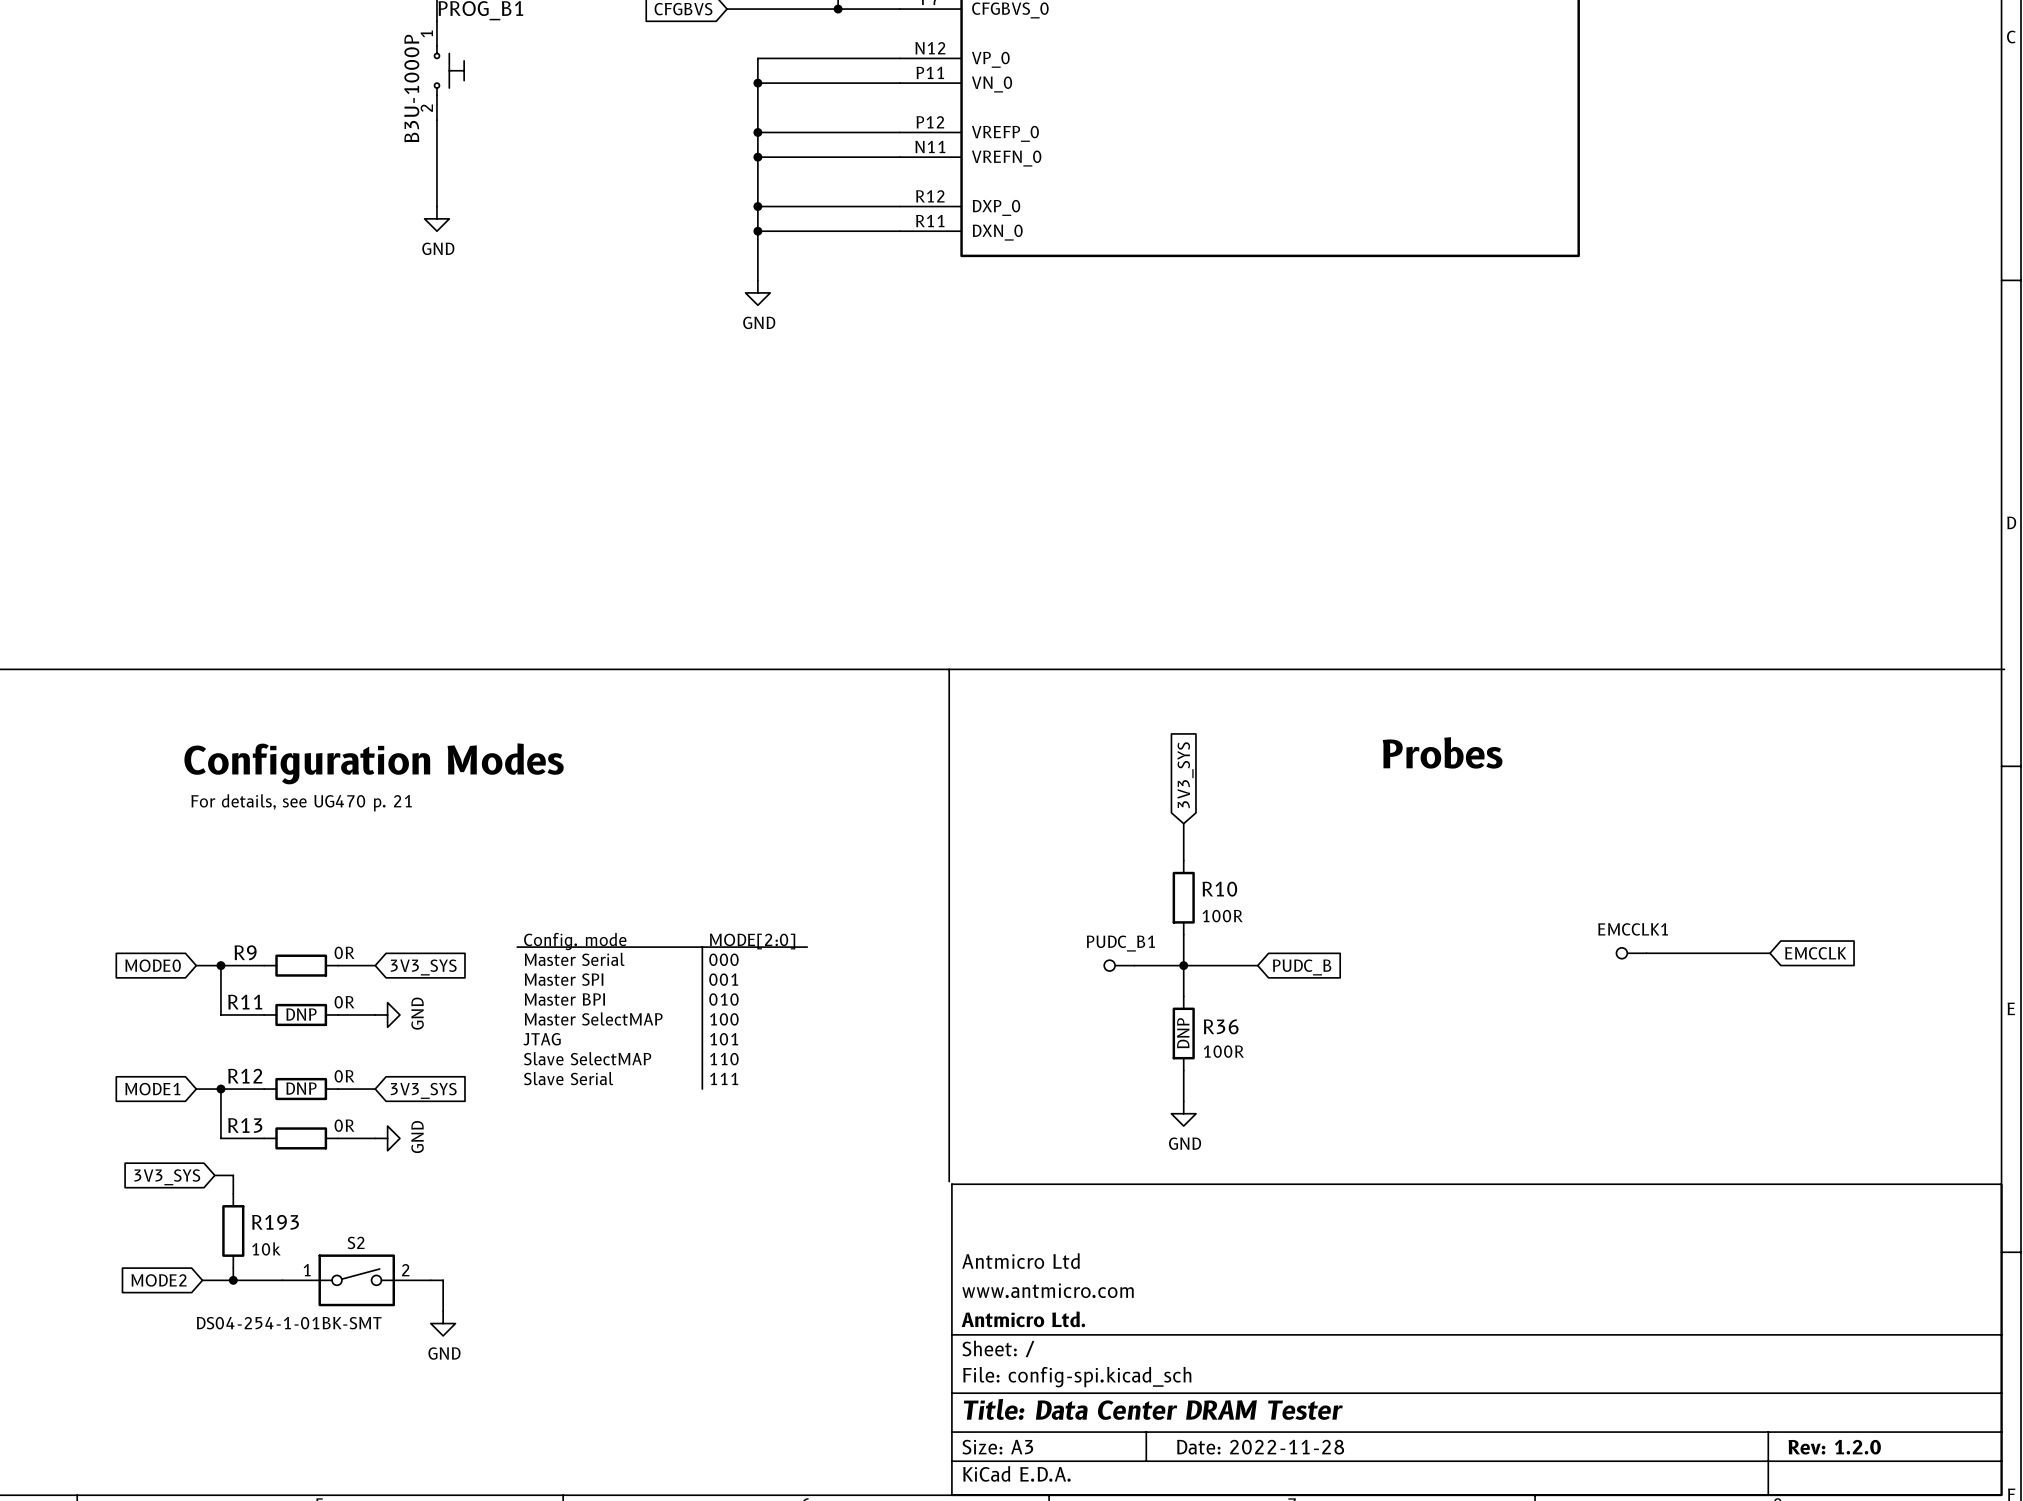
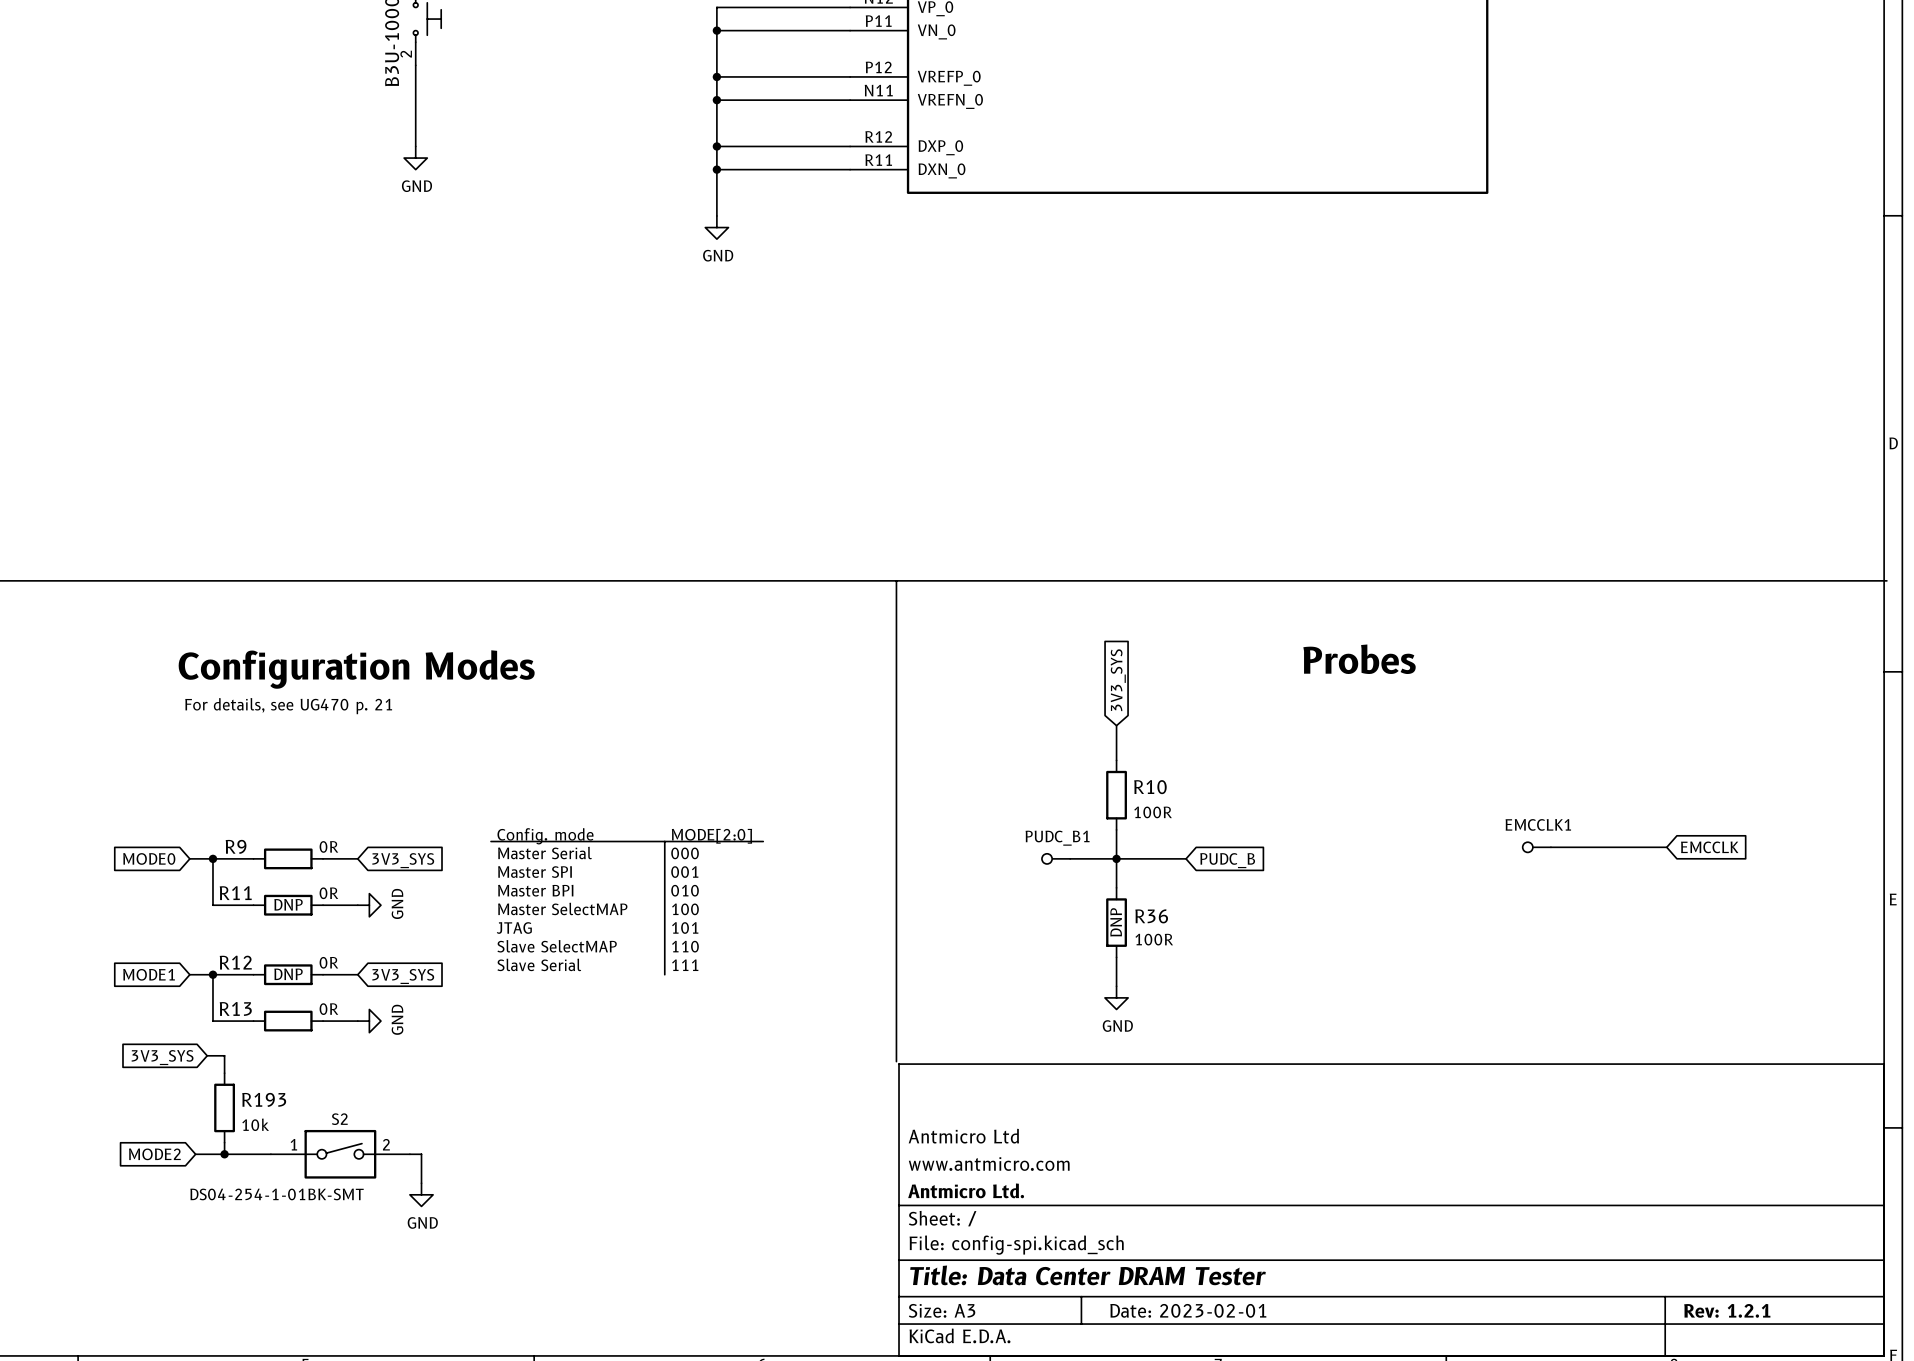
title block: Date: 2022-11-28 (1260, 1447) -> Date: 2023-02-01 (1188, 1310)
title block: Rev: 1.2.0 (1834, 1447) -> Rev: 1.2.1 (1727, 1310)

